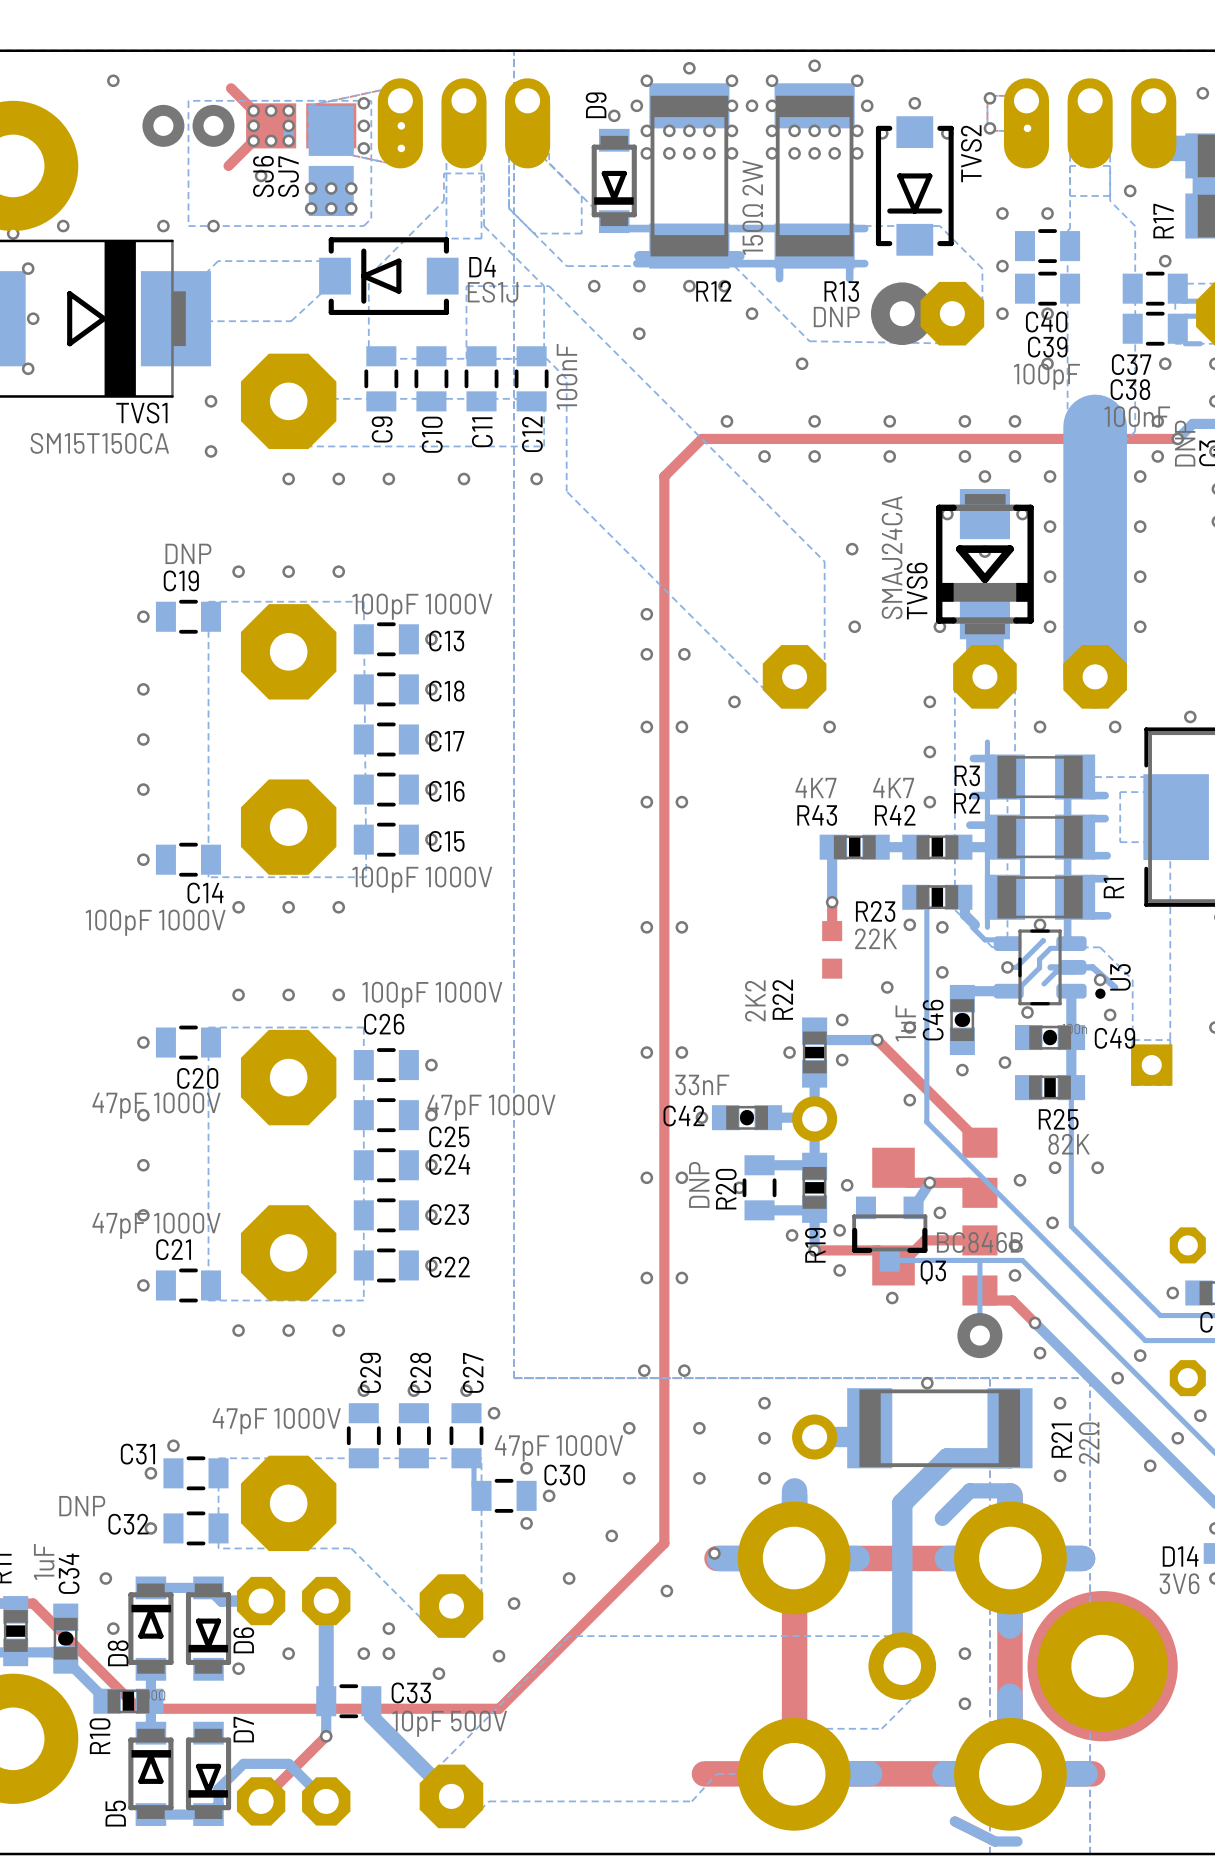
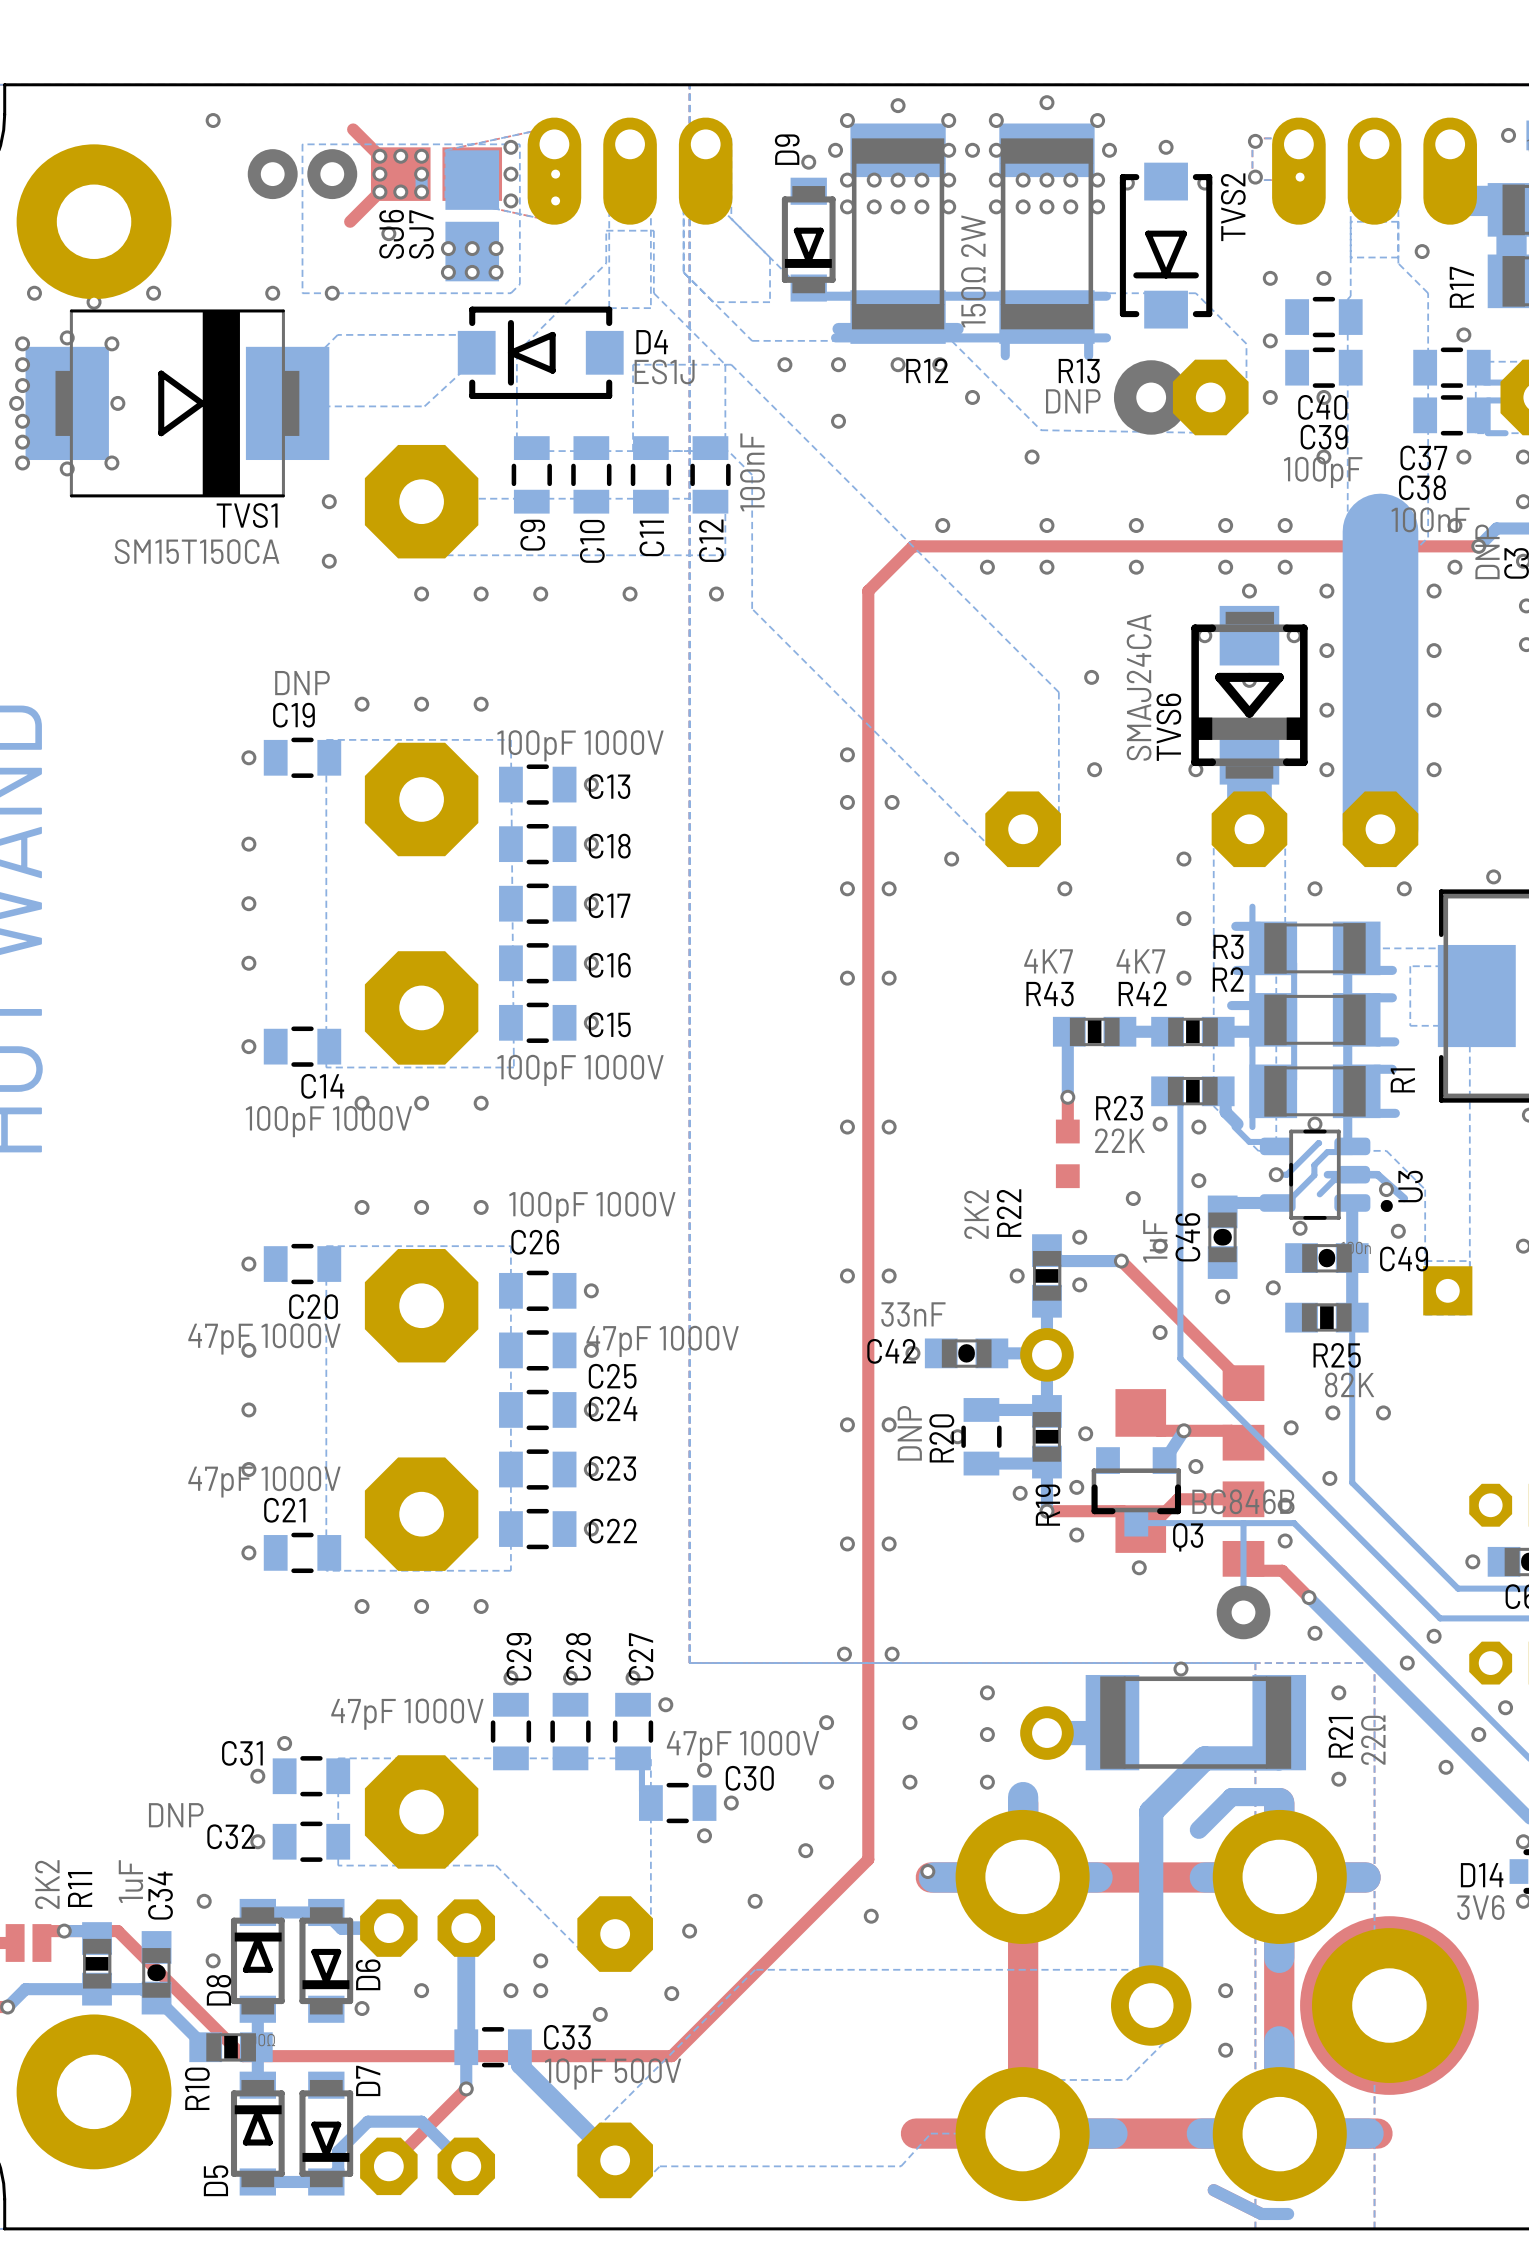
C14 value position: 100pF 1000V (155, 922) -> 100pF 1000V (328, 1121)

